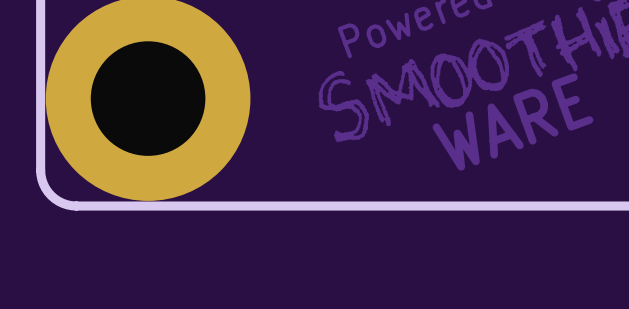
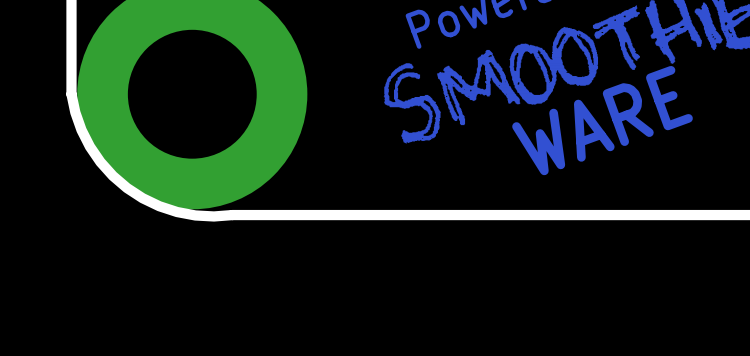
board edge: (40, 98) (40, 174) (45, 188) (54, 198) (62, 203) (76, 206) (183, 206) -> (71, 94) (75, 112) (89, 146) (112, 175) (127, 188) (159, 206) (177, 212) (213, 216) (232, 215)

